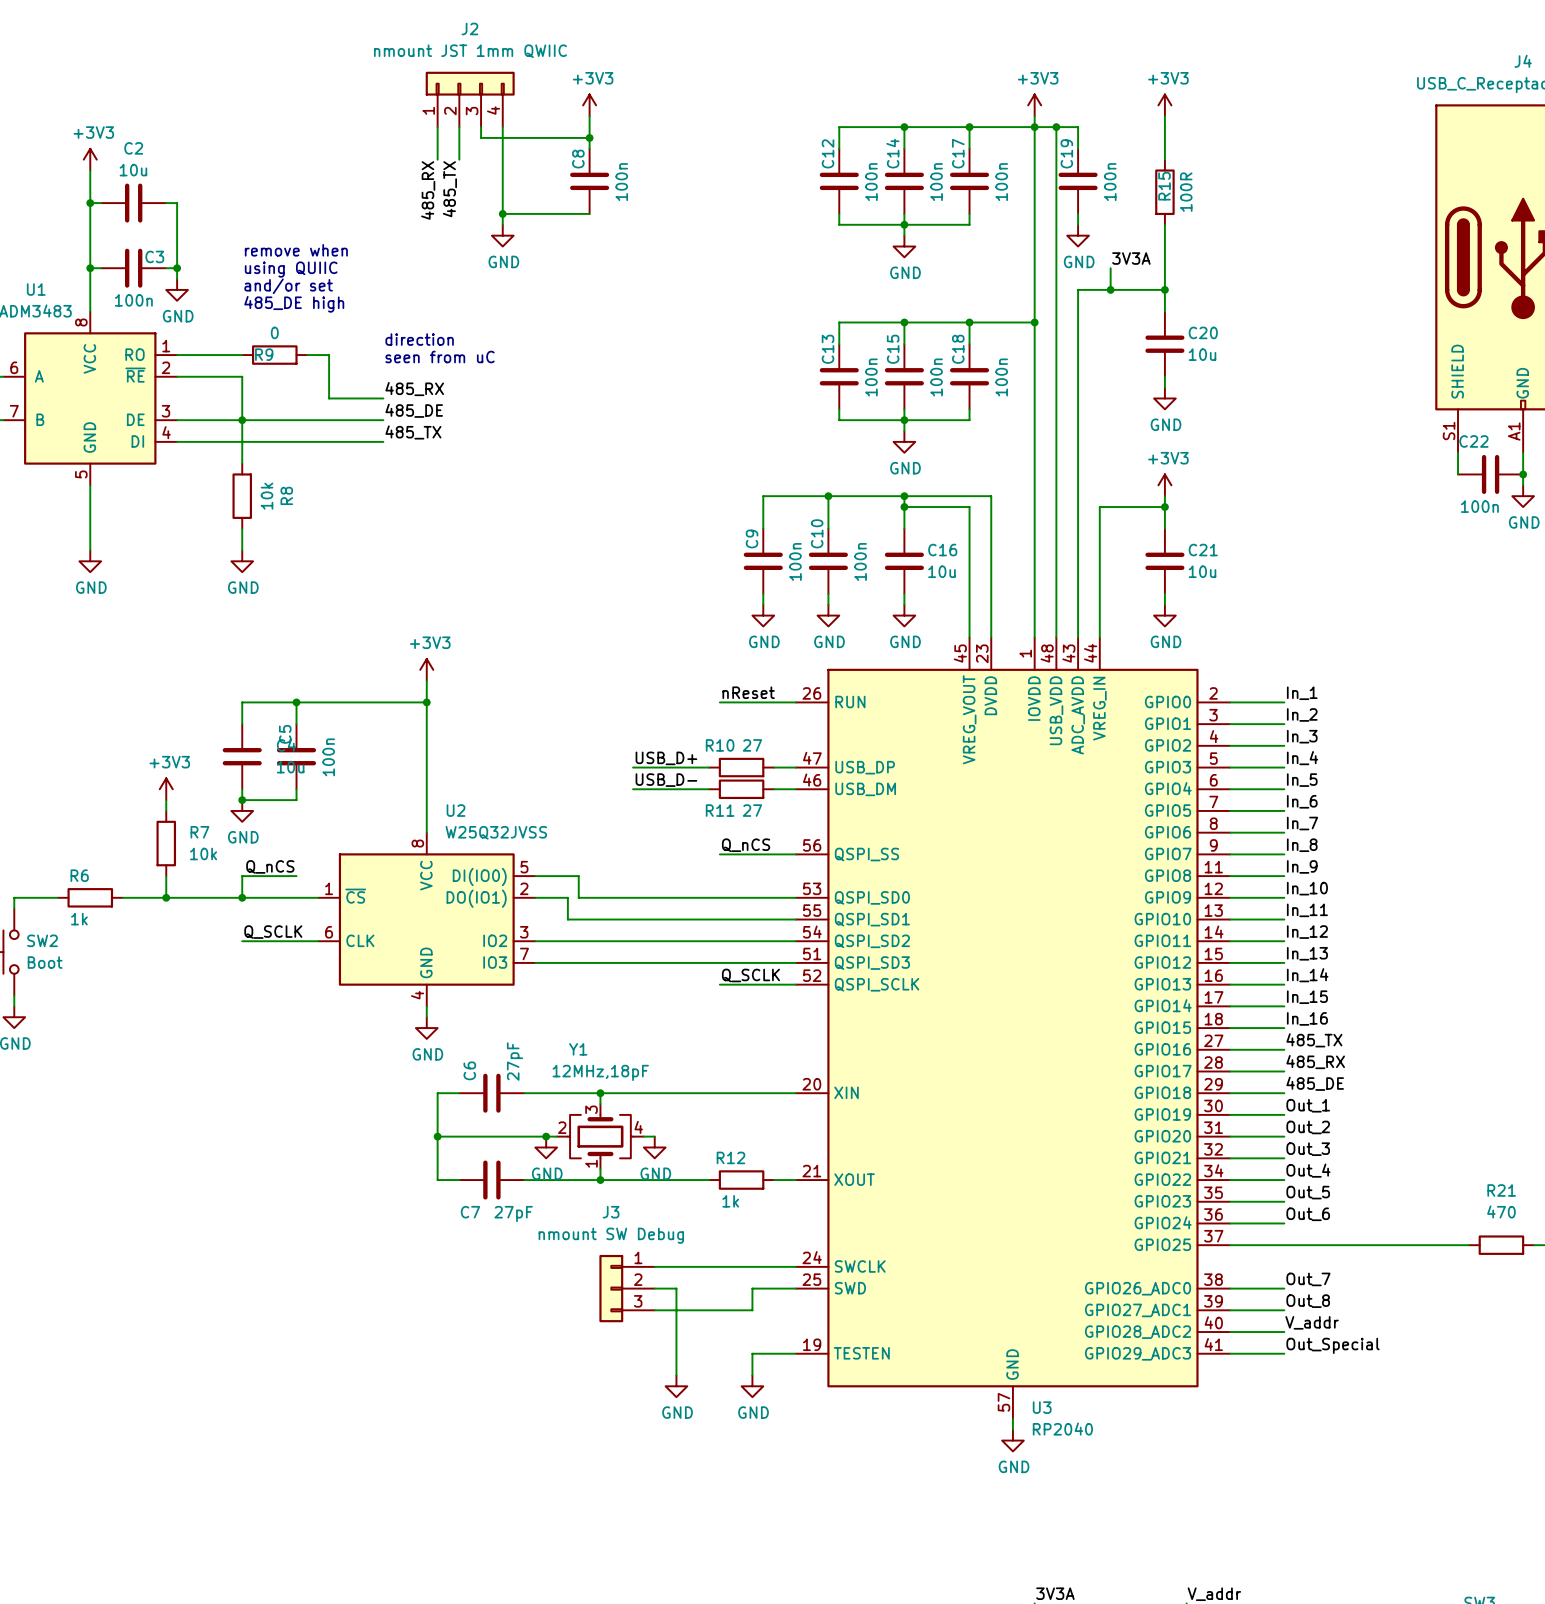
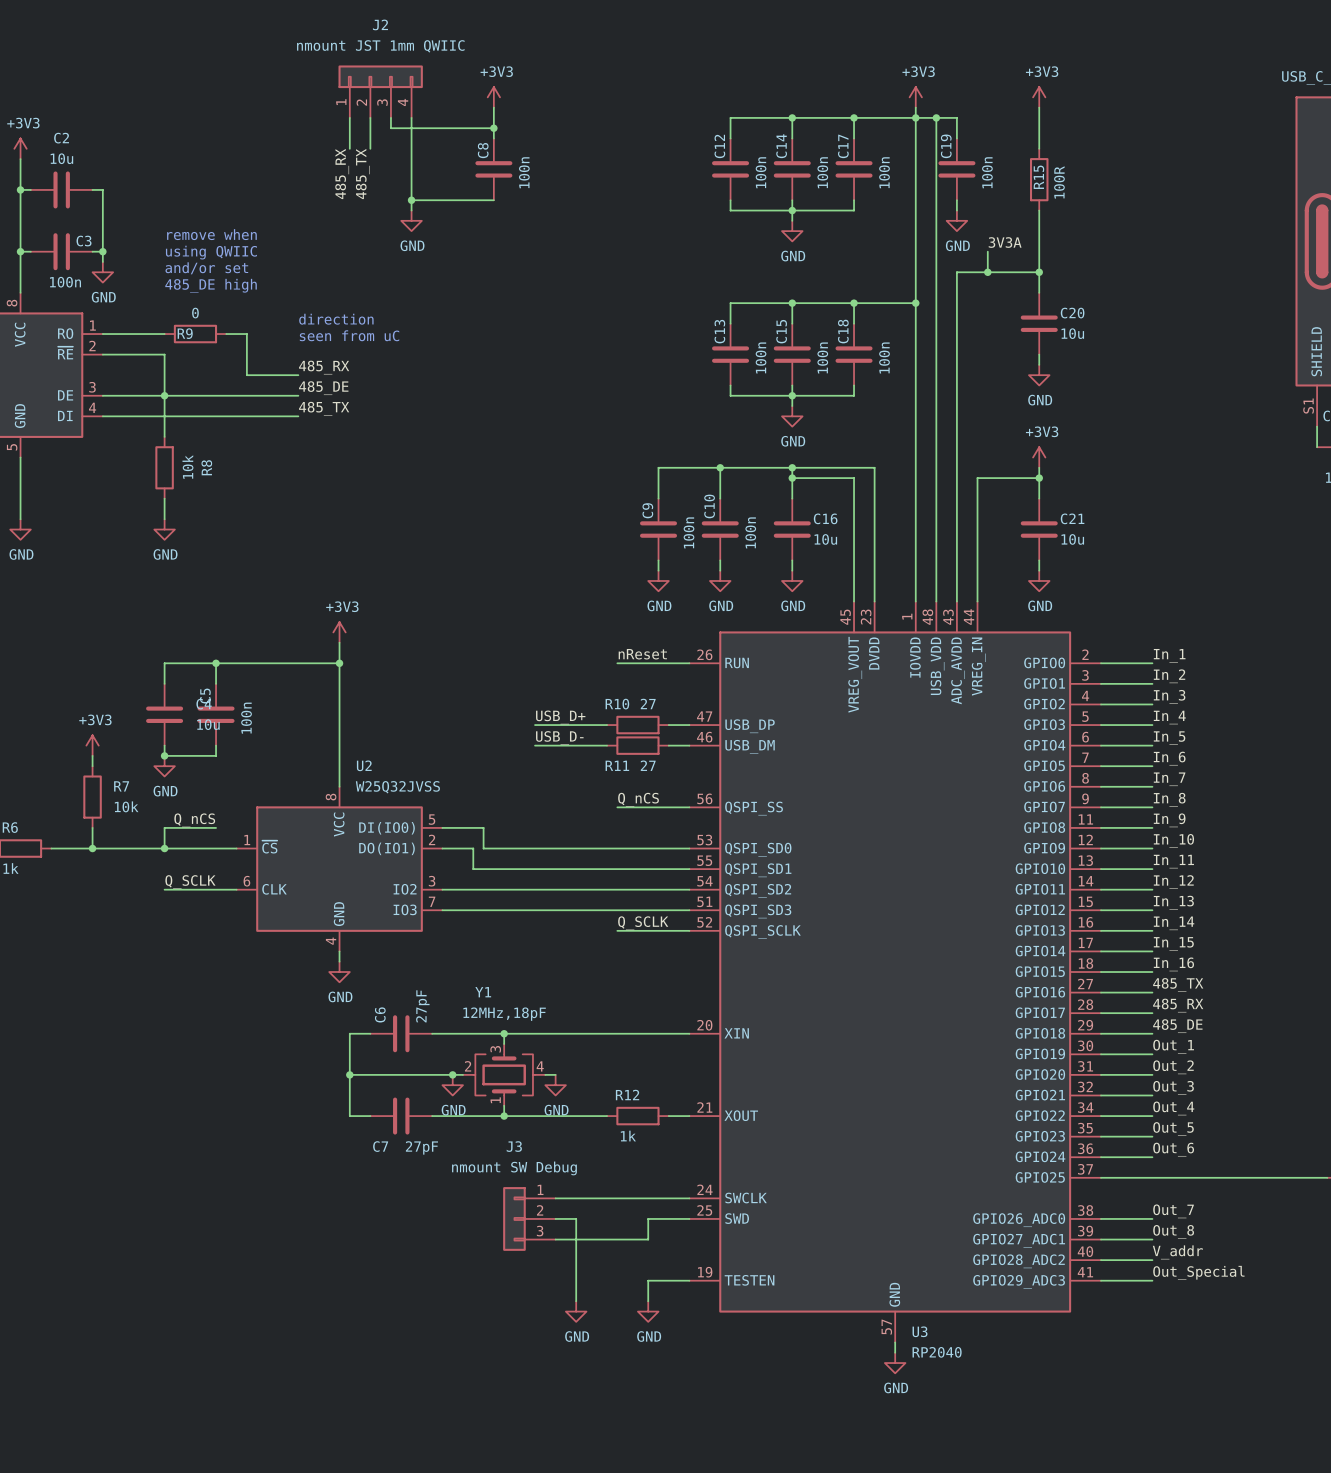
text: using QUIIC (291, 269) -> using QWIIC (211, 252)

